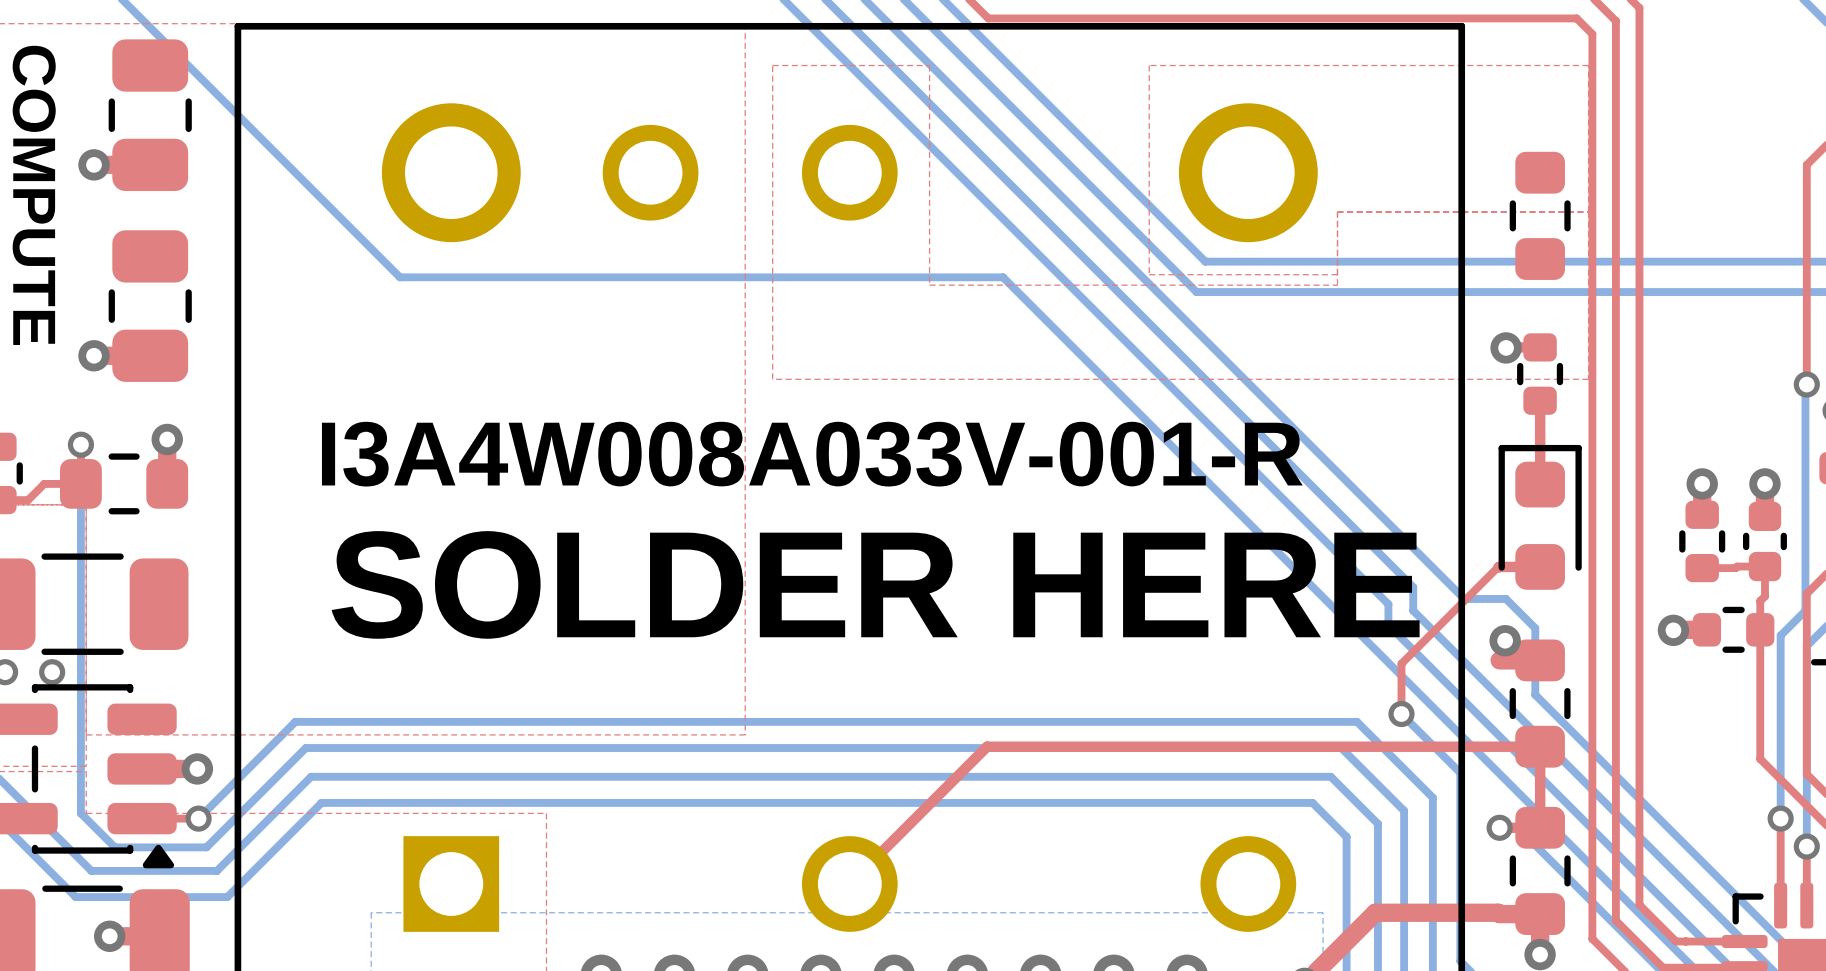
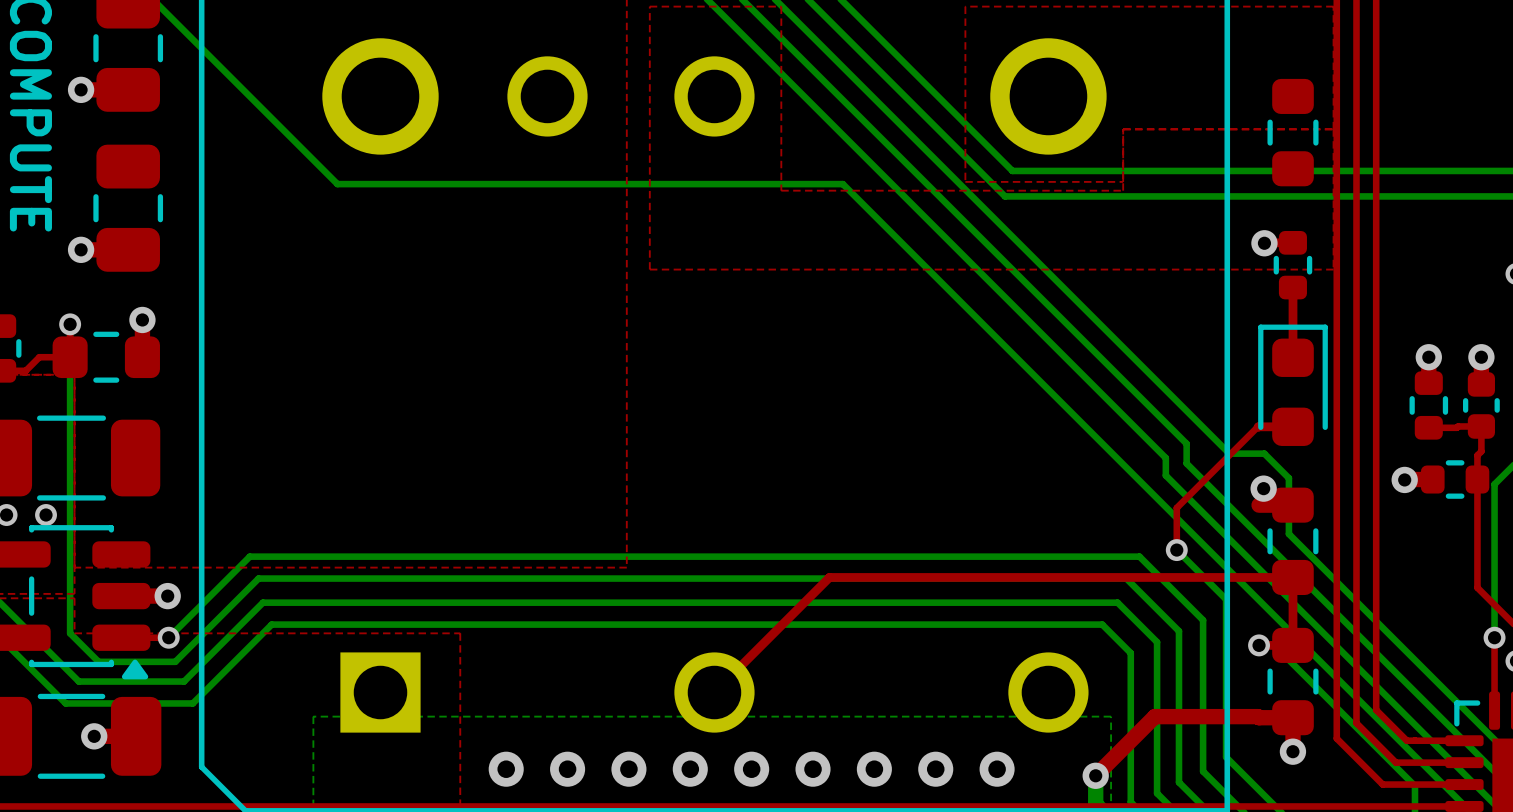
text: I3A4W008A033V-001-R (812, 454) -> none
text: SOLDER HERE (875, 584) -> none

